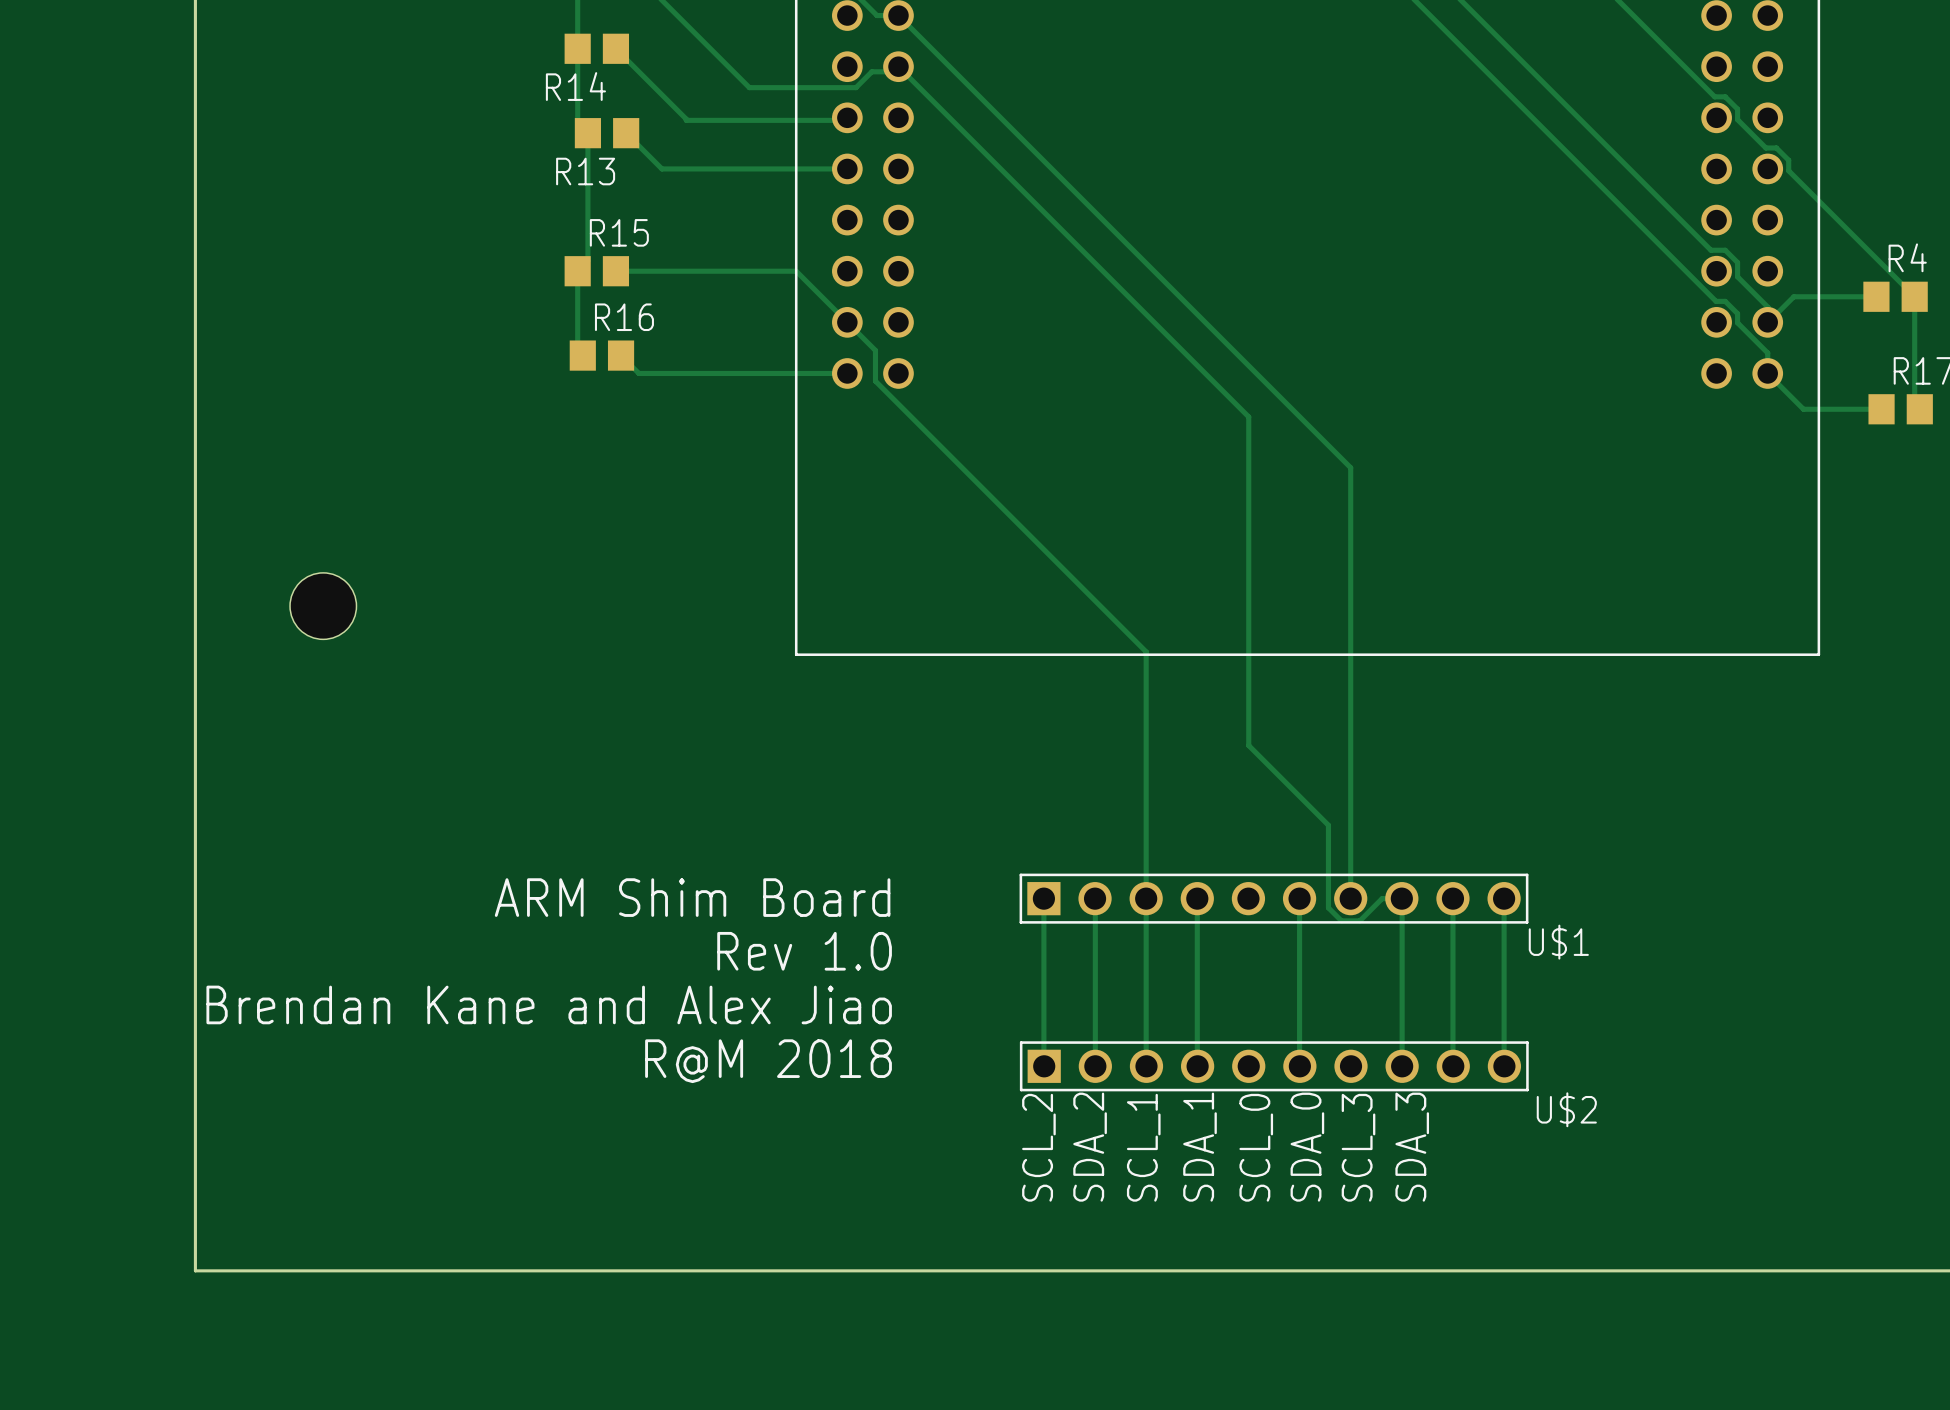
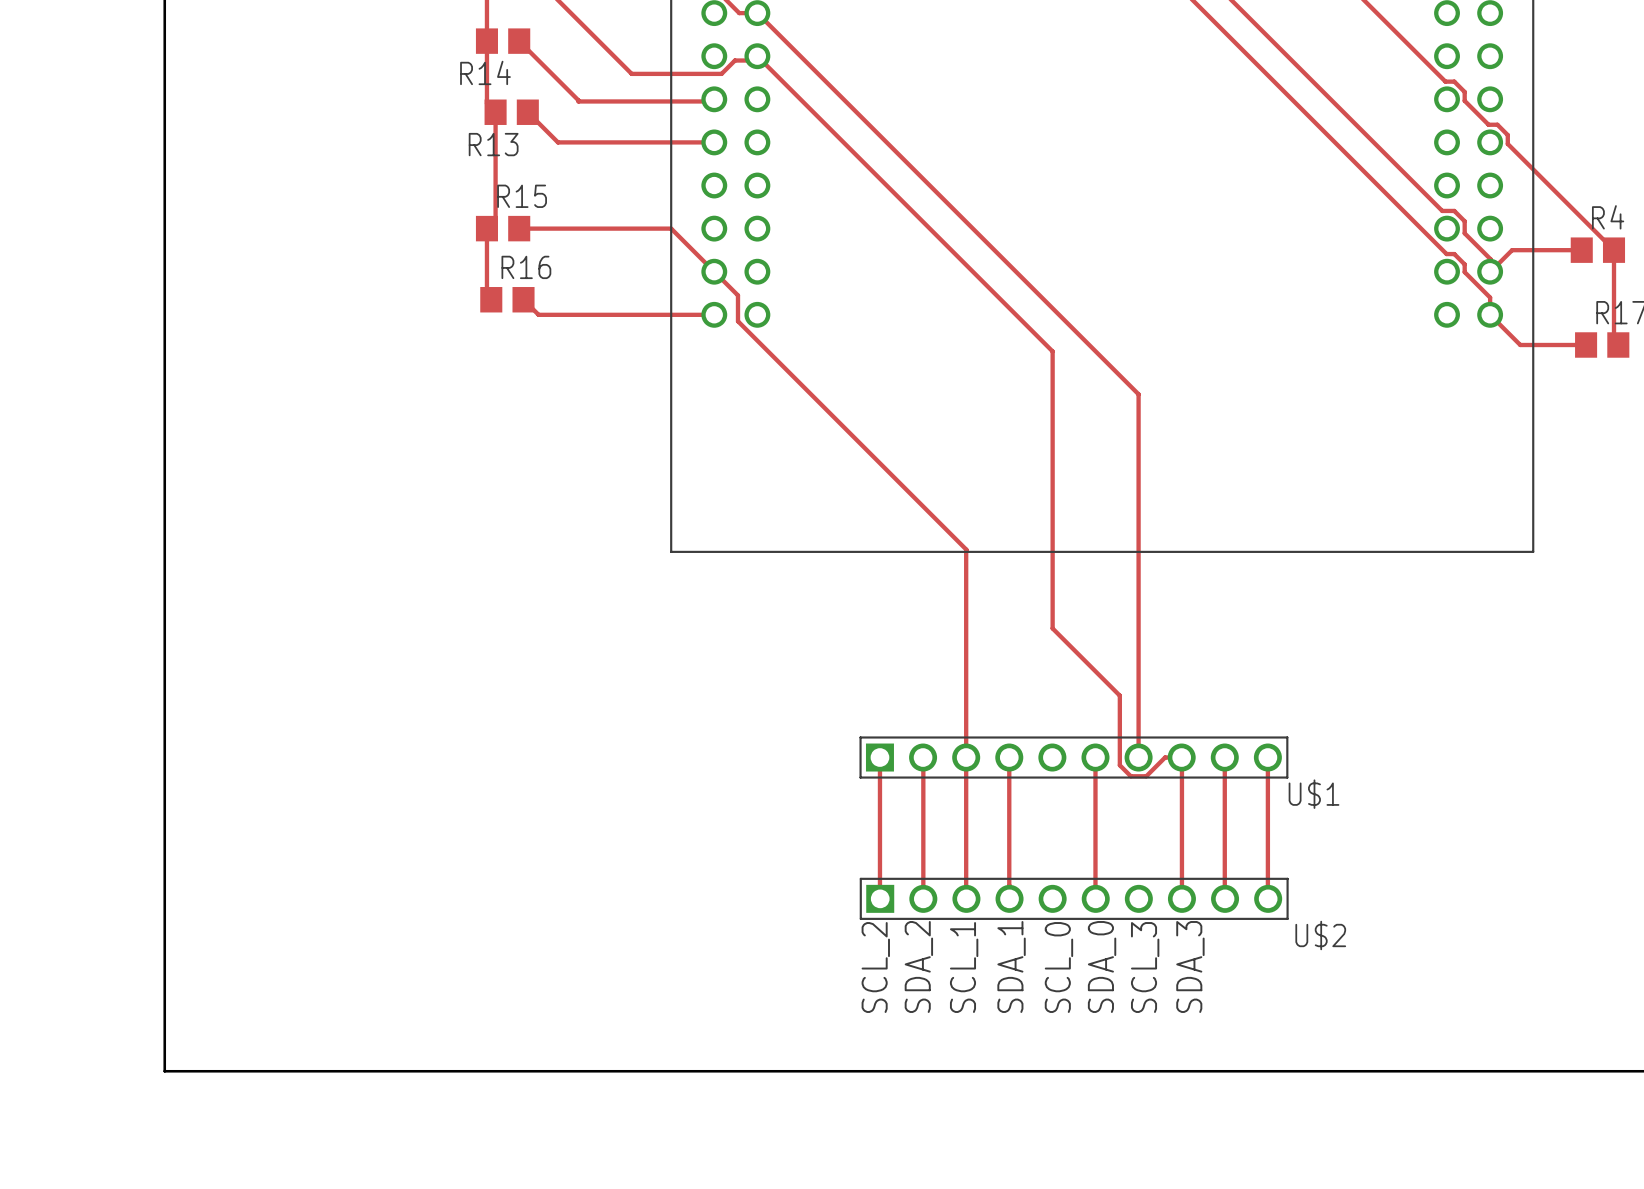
hole: (323, 606) -> none
text: ARM Shim Board (692, 897) -> none
text: Rev 1.0 (804, 951) -> none
text: Brendan Kane and Alex Jiao (549, 1004) -> none
text: R@M 2018 (768, 1061) -> none

